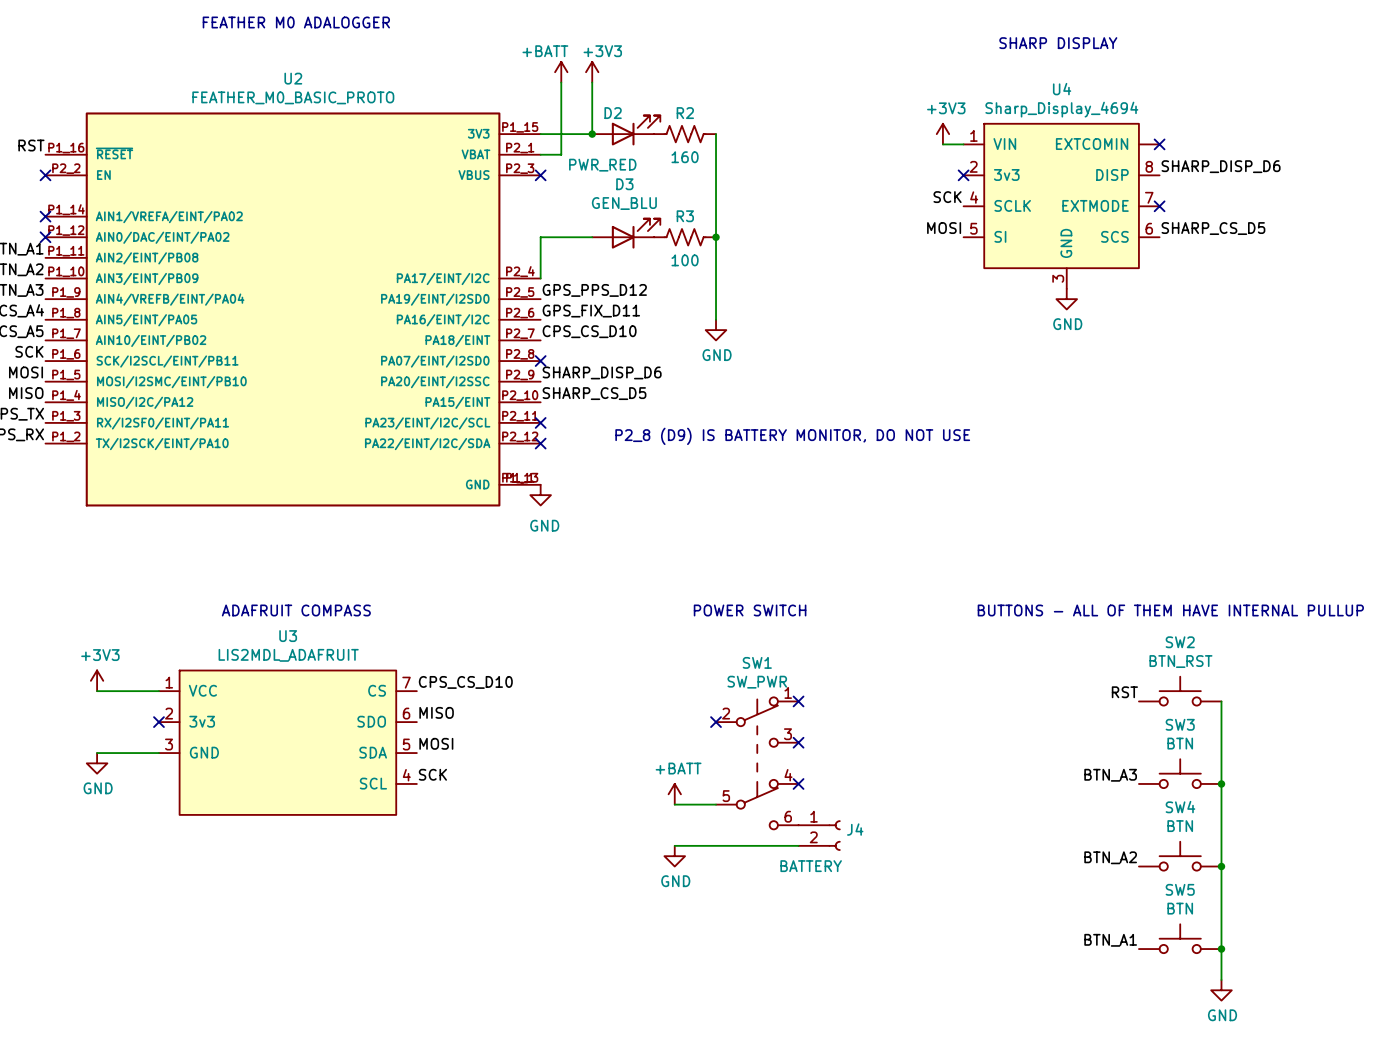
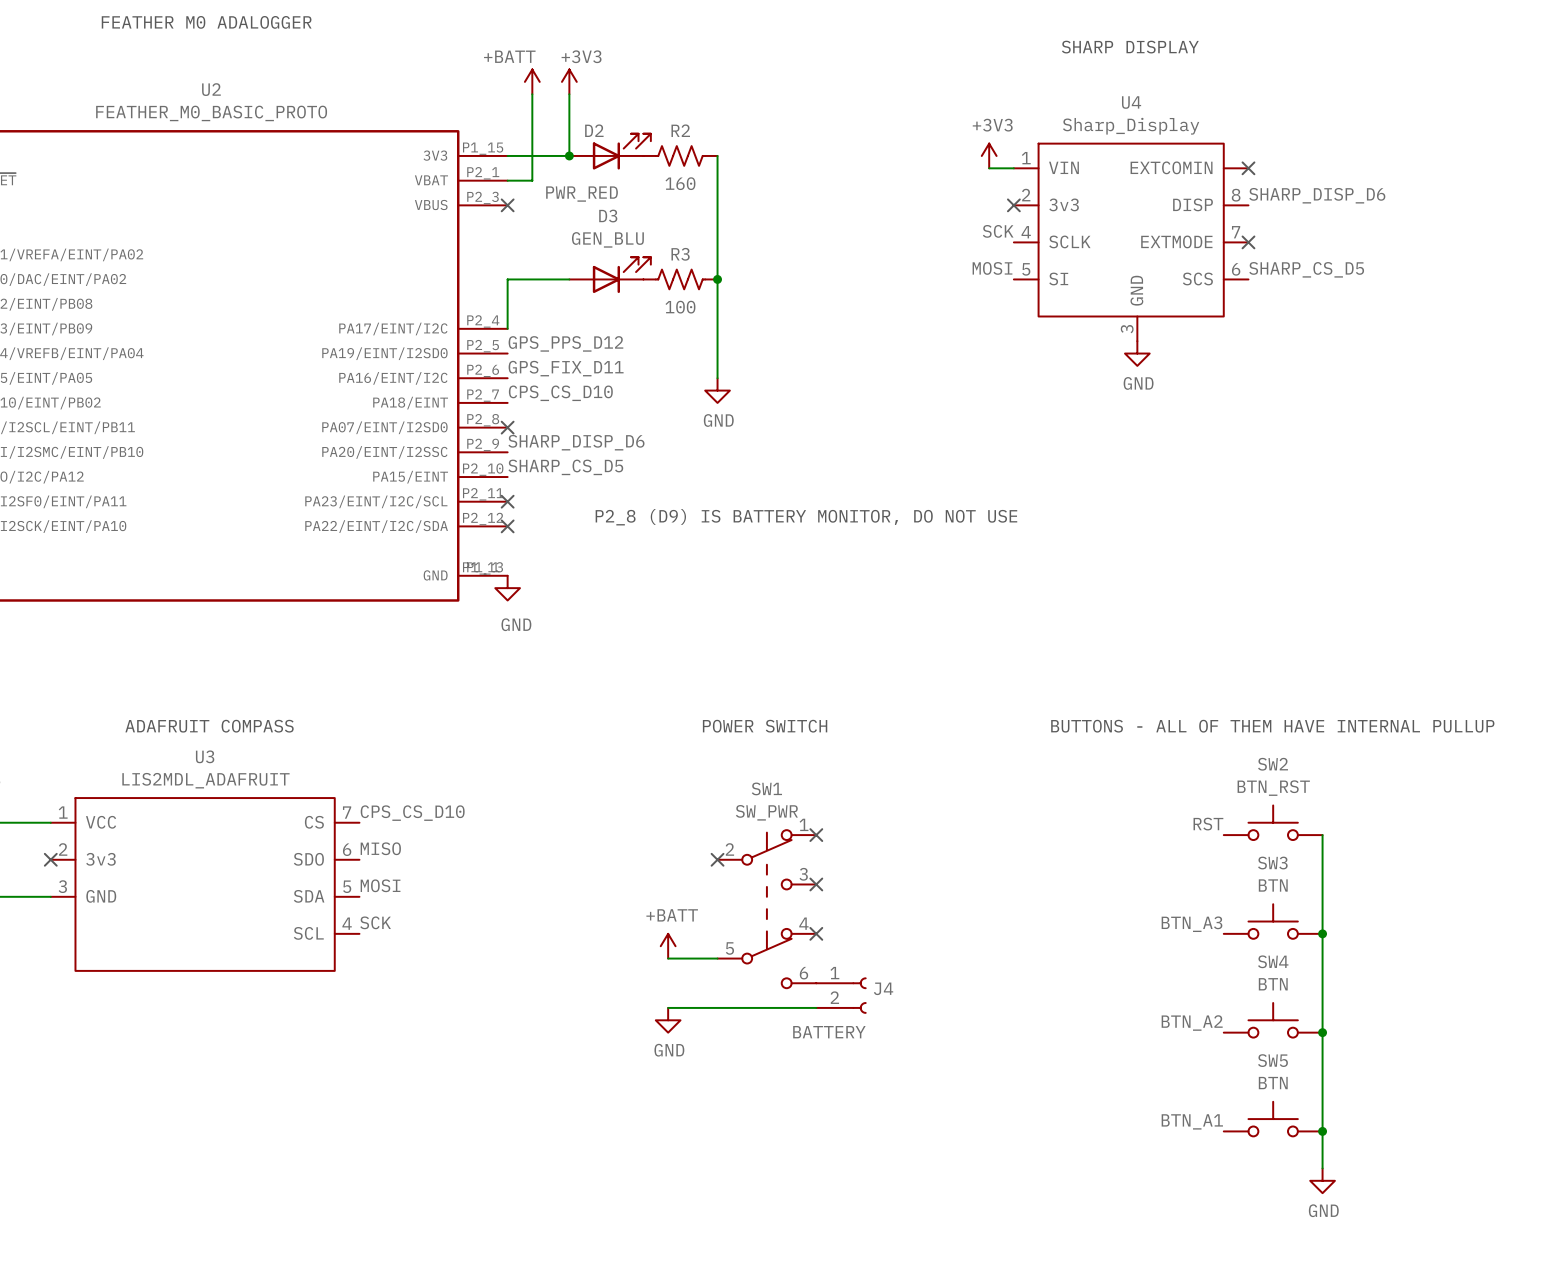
U4 value: Sharp_Display_4694 (1061, 109) -> Sharp_Display (1131, 126)

